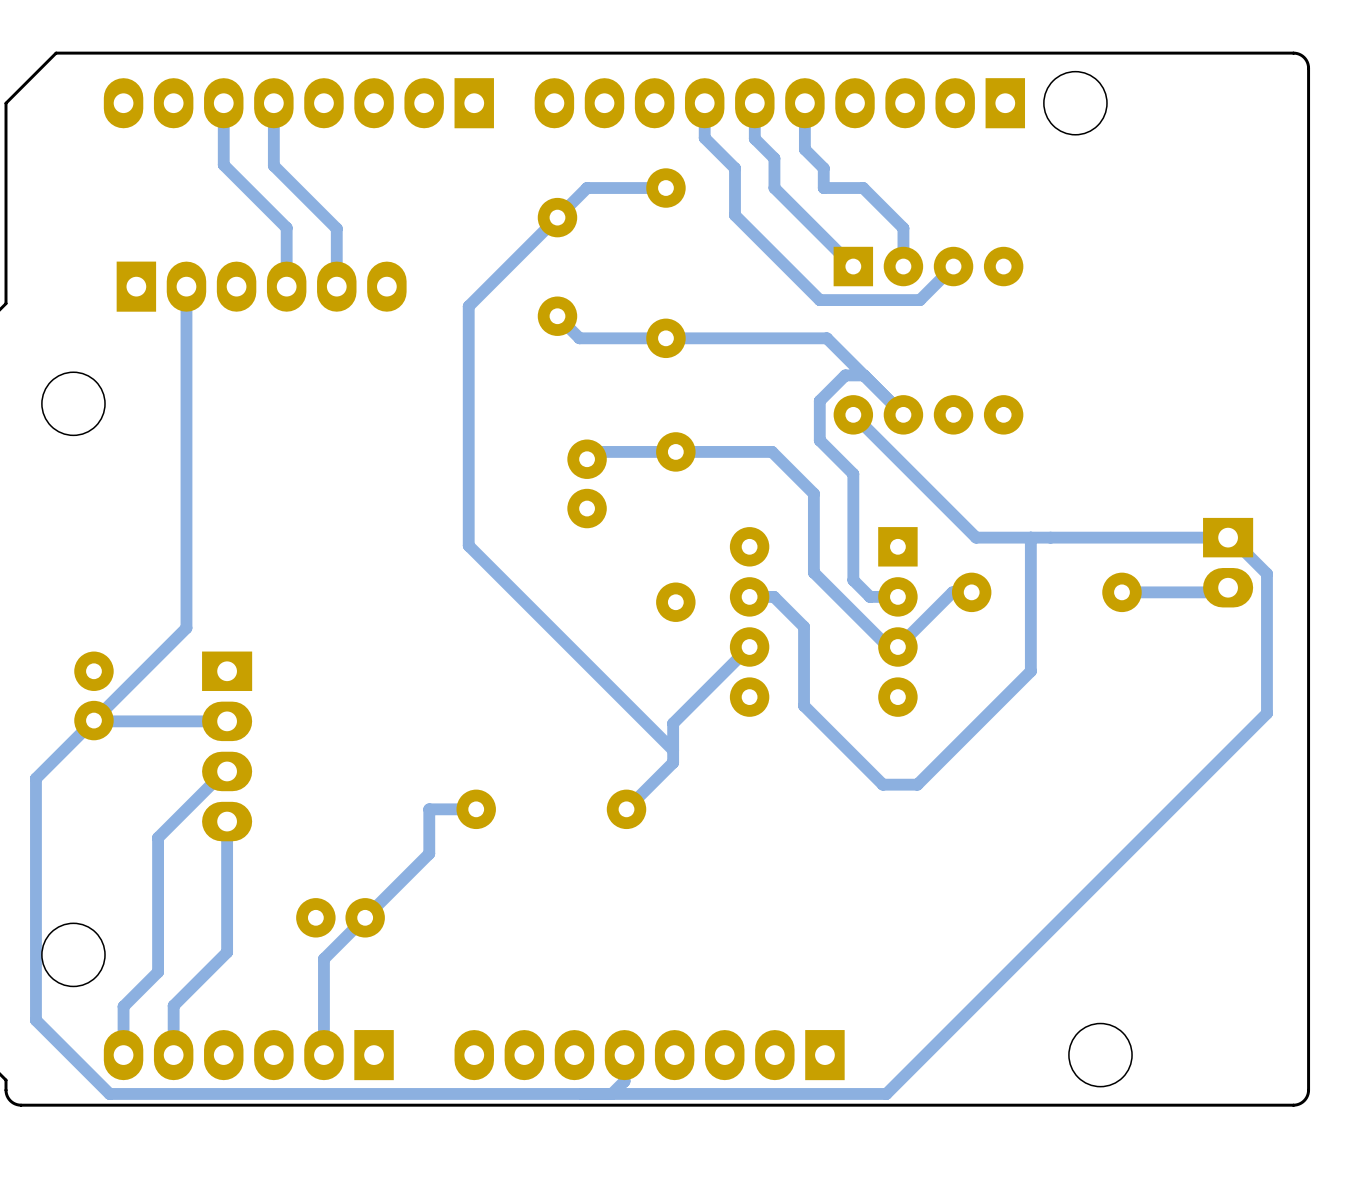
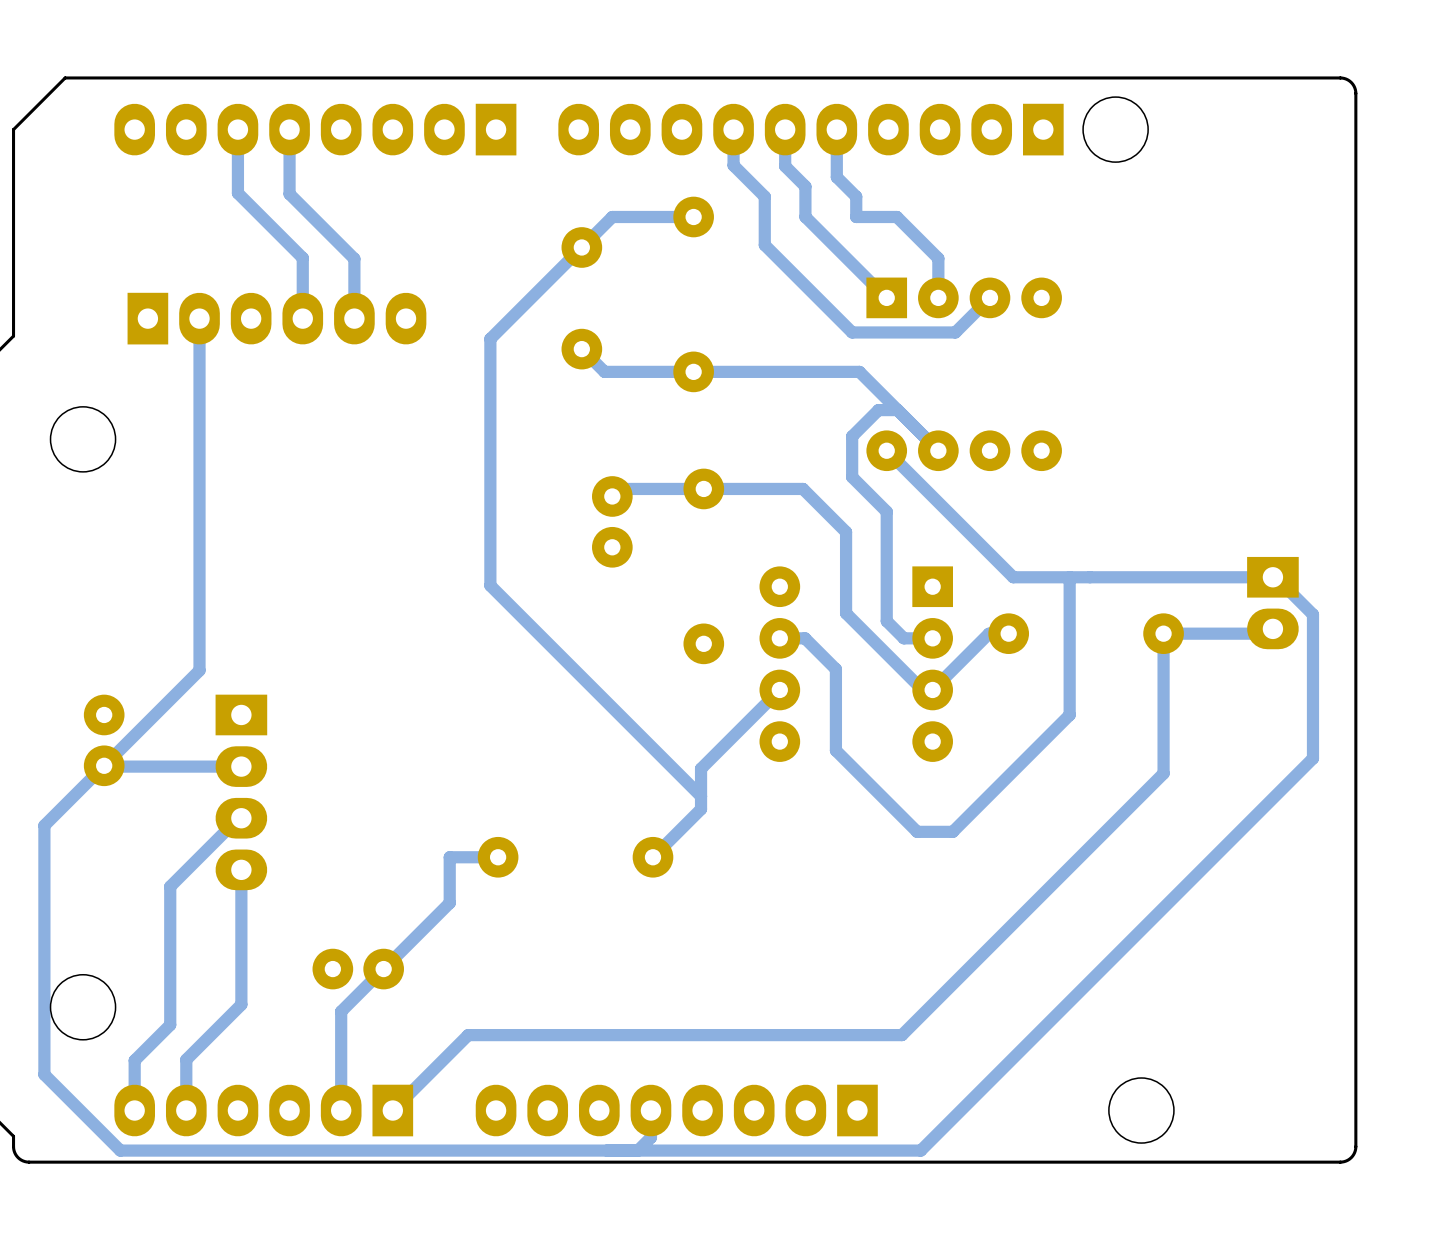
bottom track: none -> (1163, 633) (1163, 773) (901, 1035) (468, 1035) (392, 1110)

